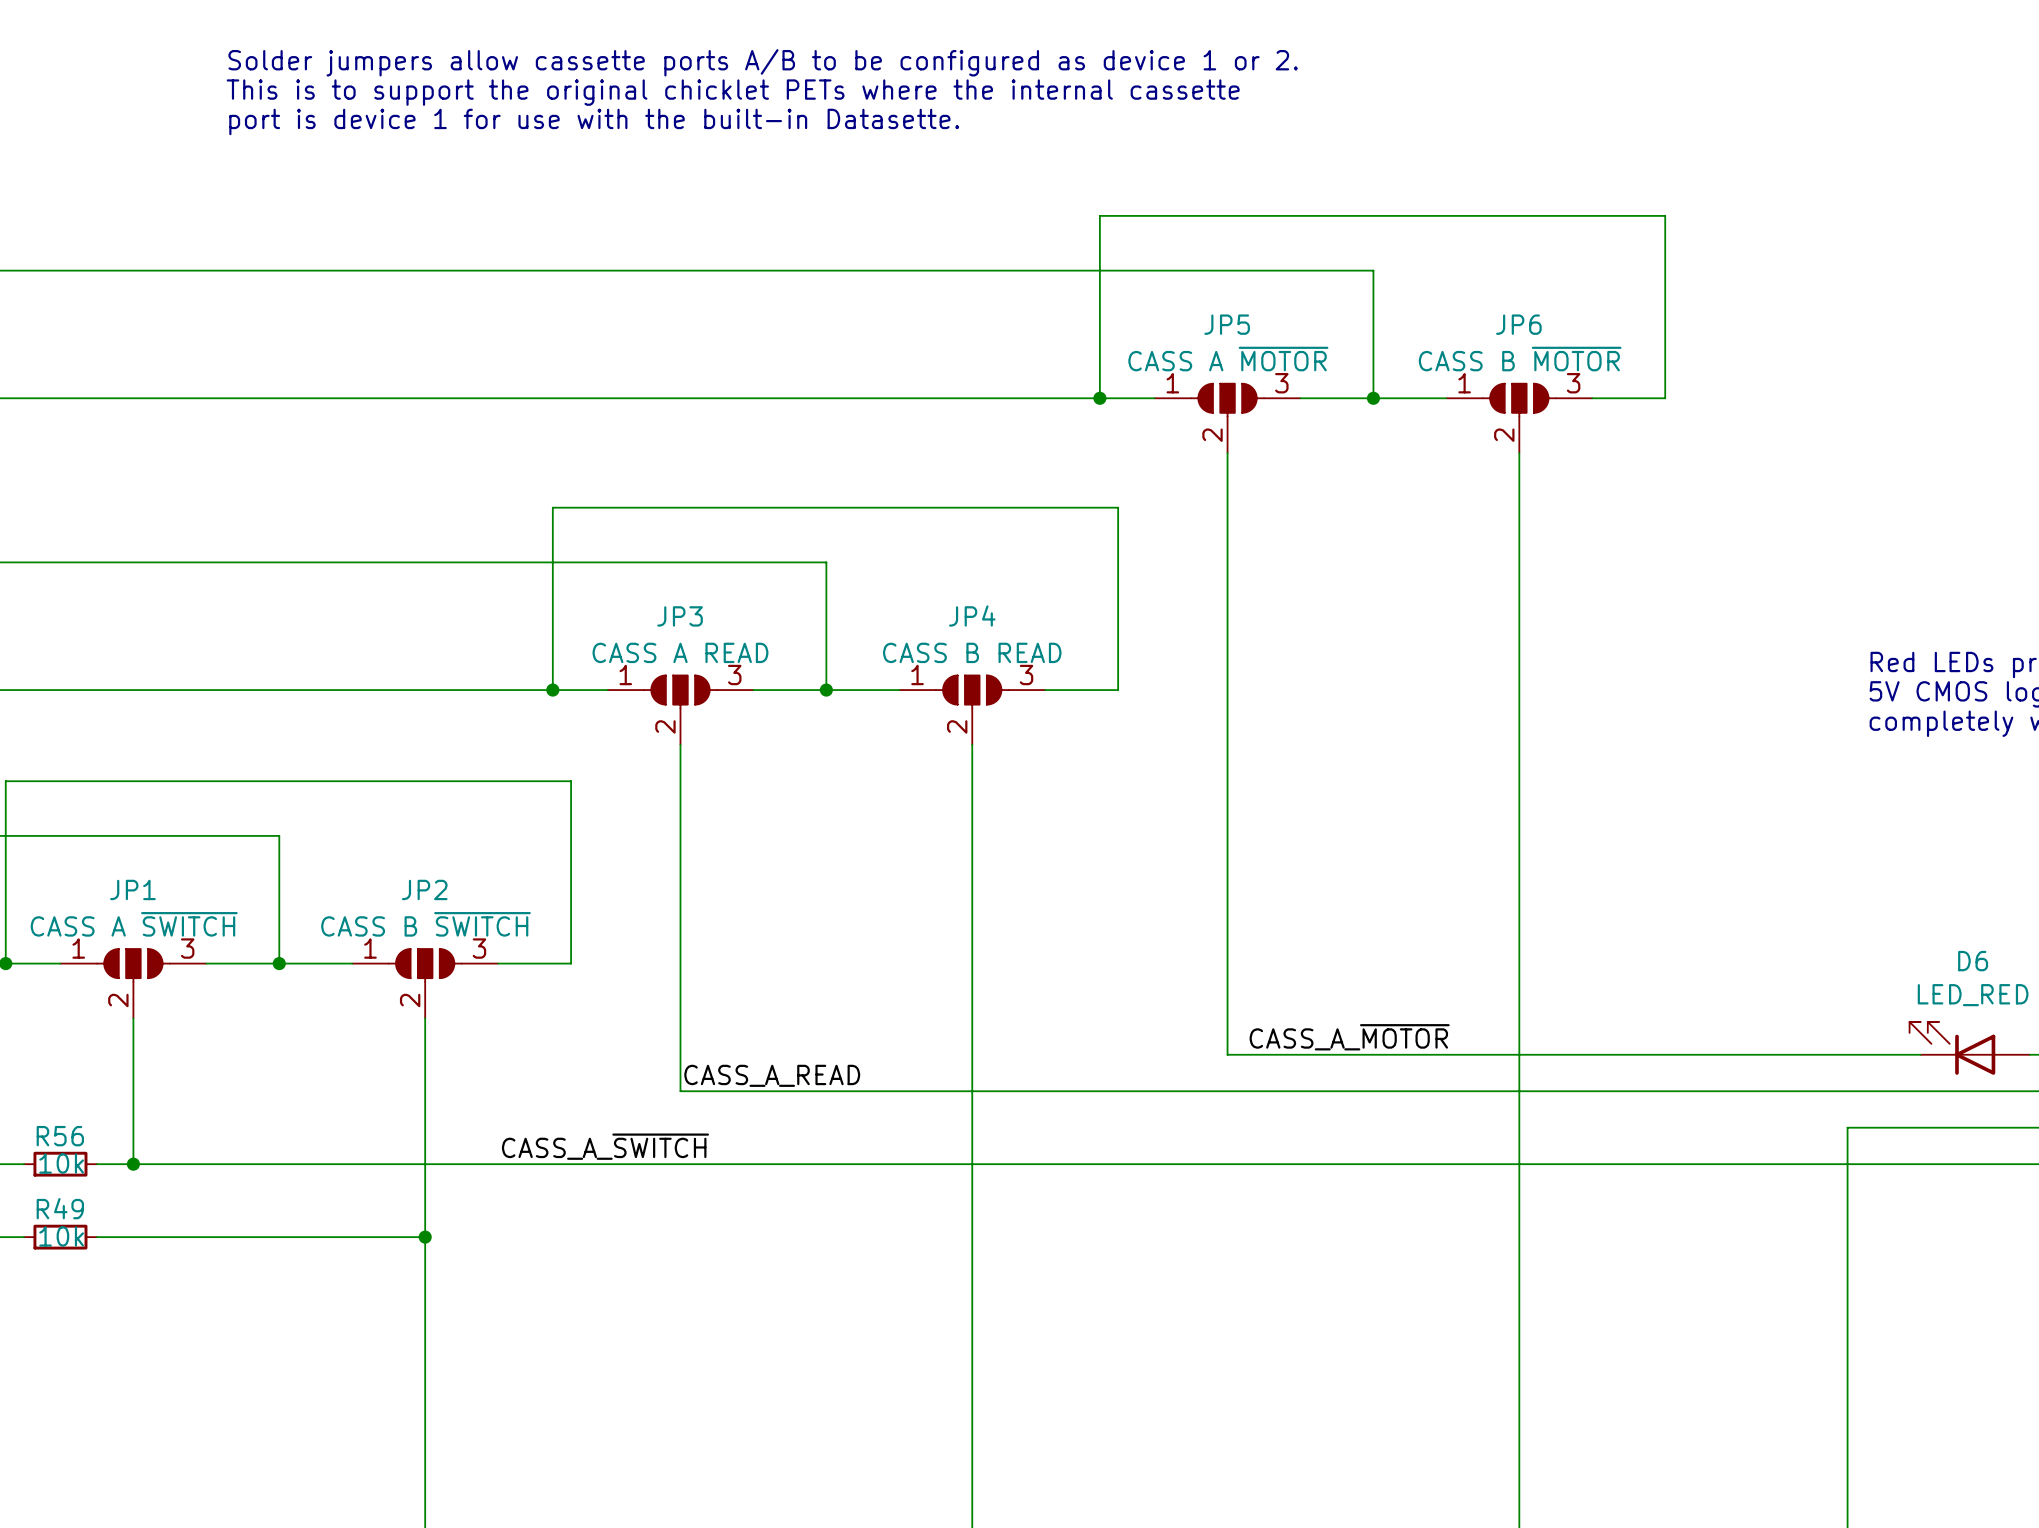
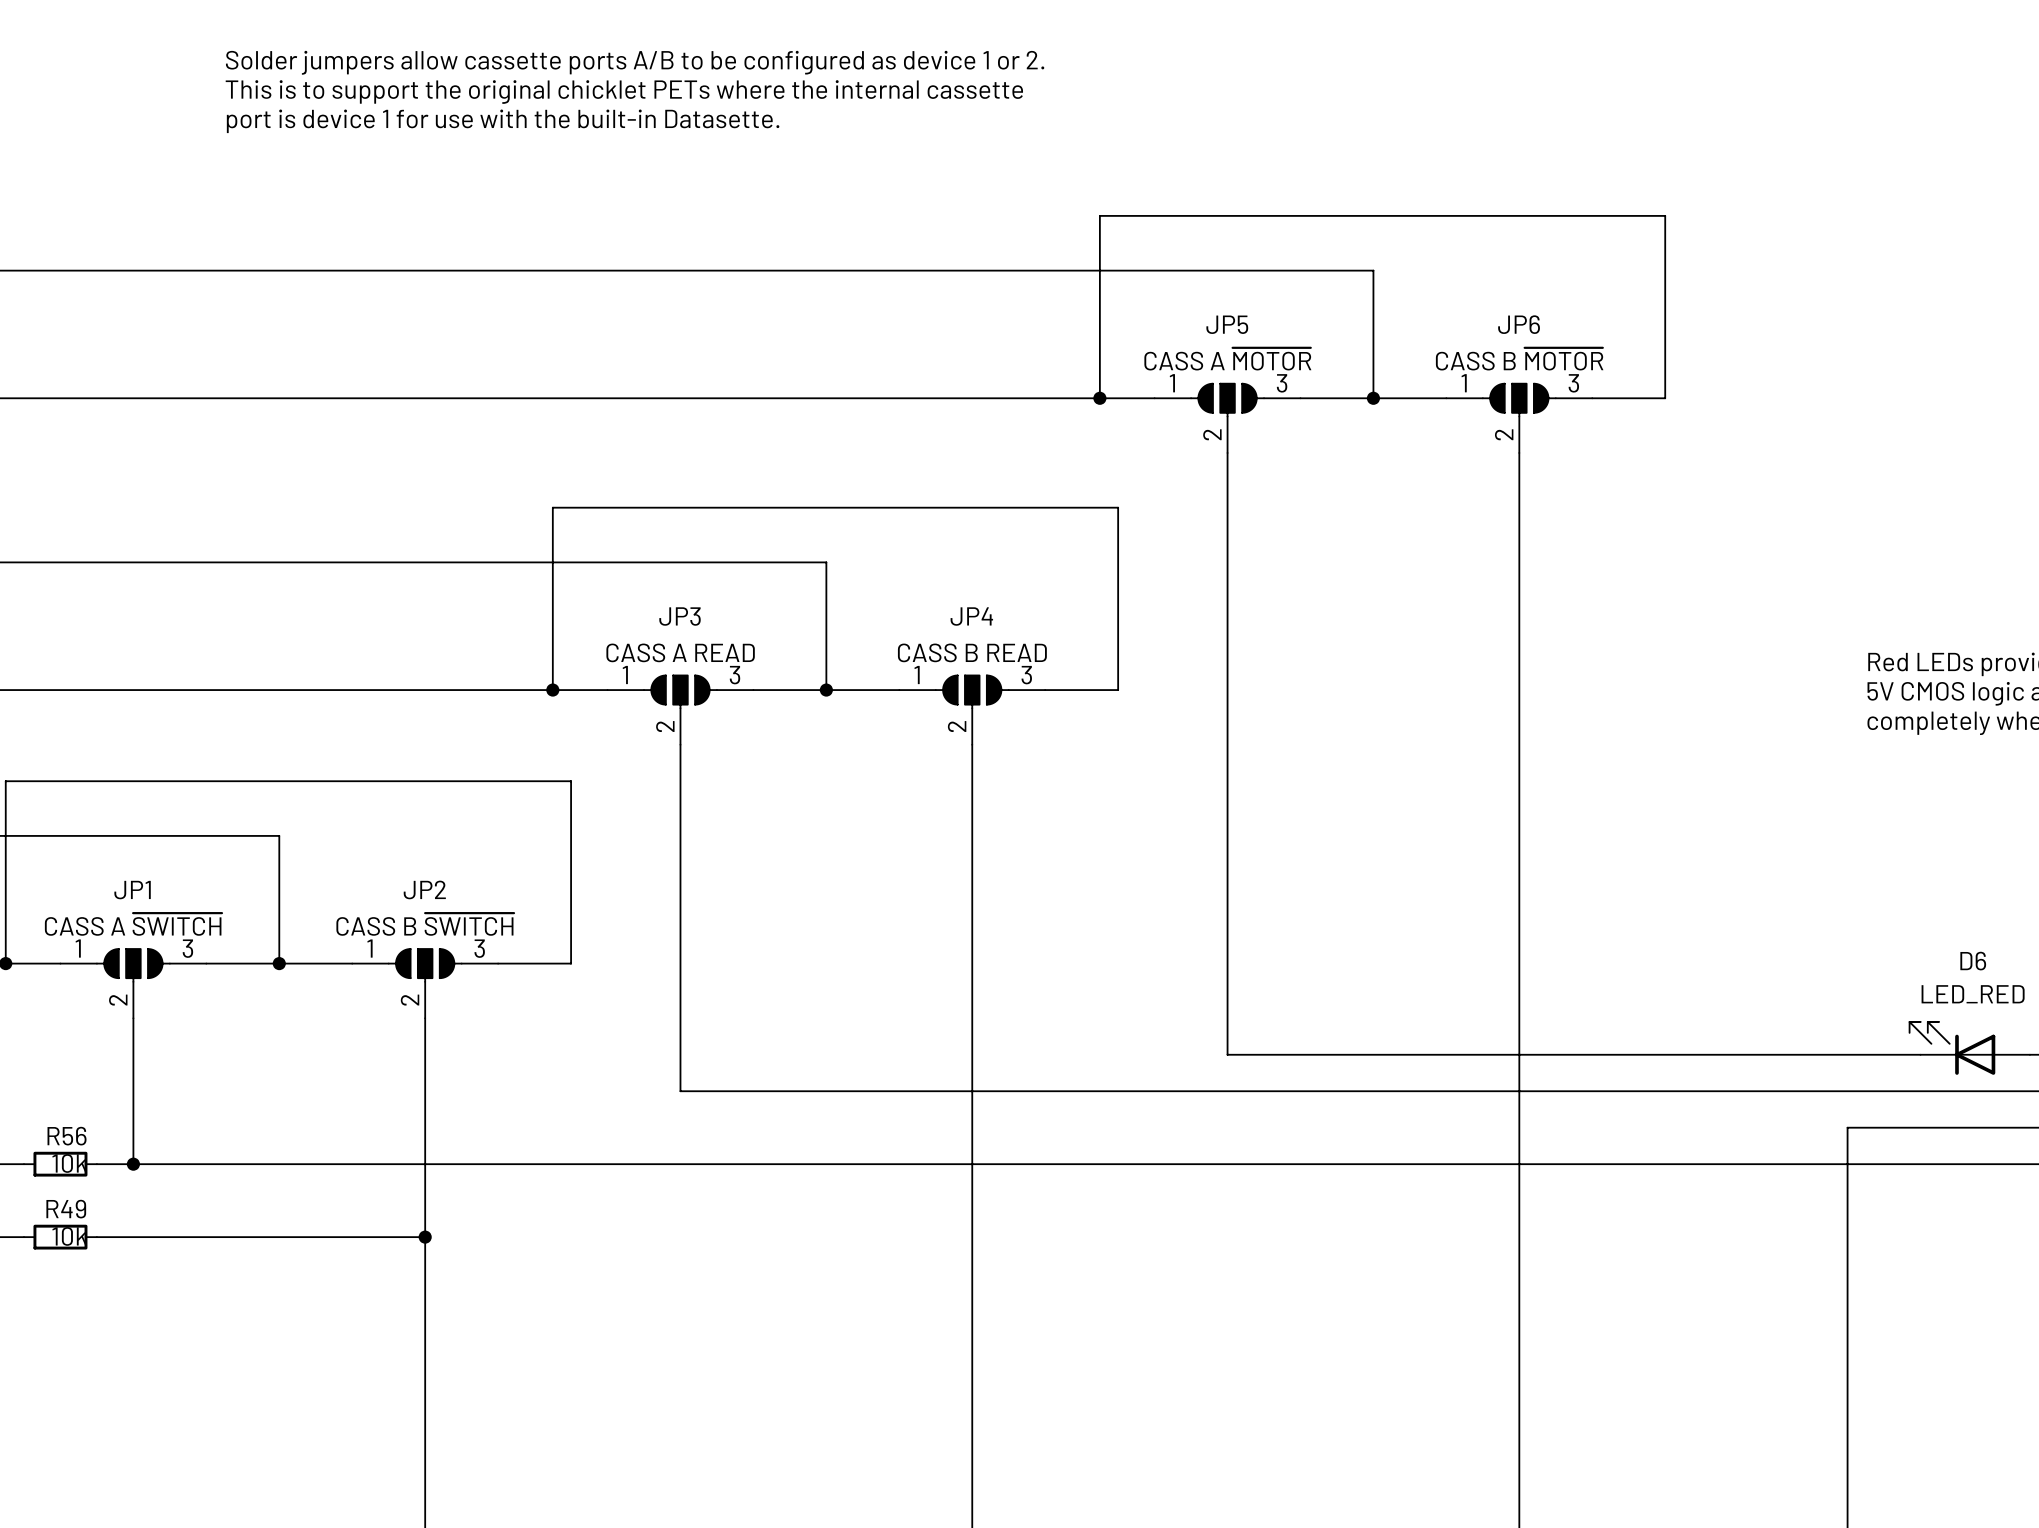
label: CASS_A_~{MOTOR} (1349, 1037) -> none
label: CASS_A_READ (772, 1075) -> none
label: CASS_A_~{SWITCH} (605, 1146) -> none

